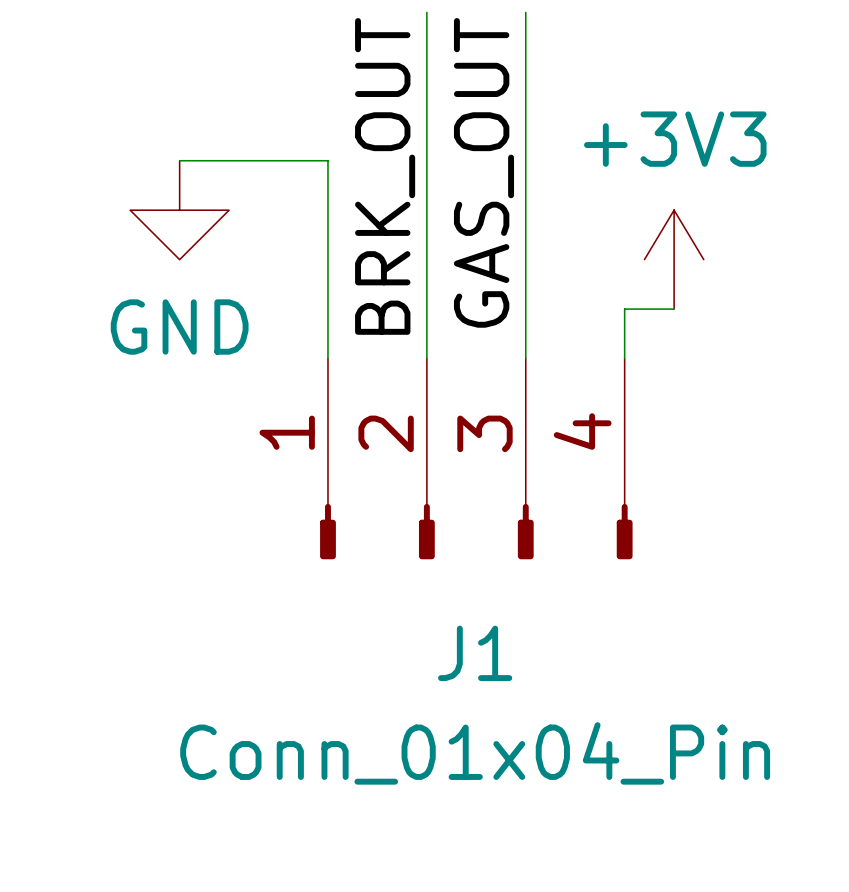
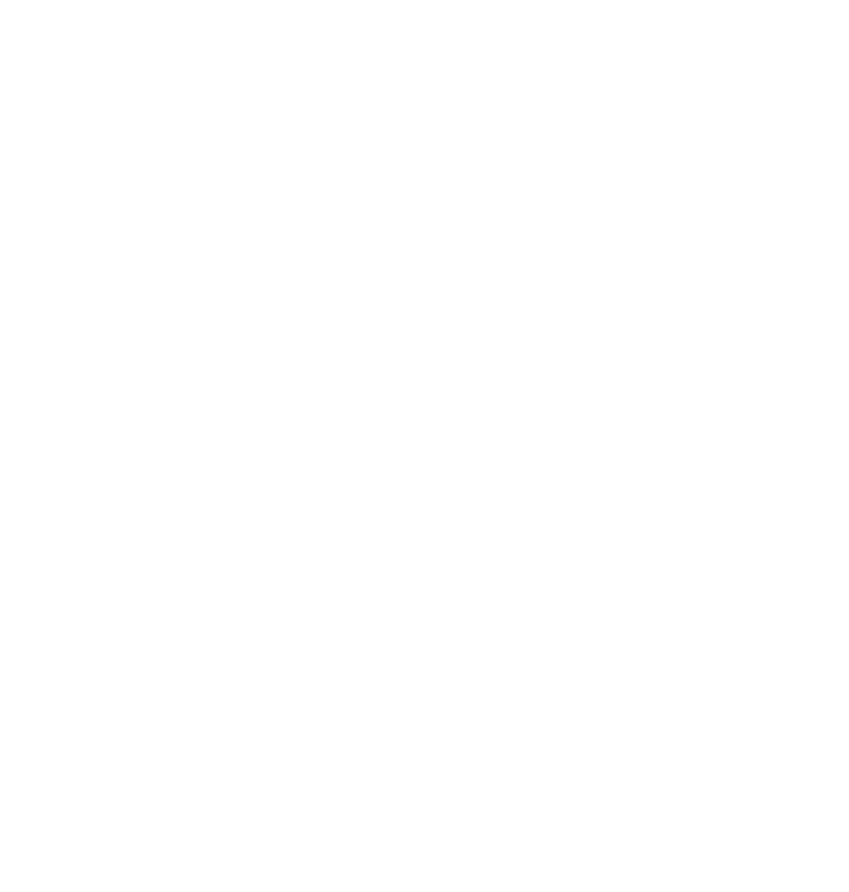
wire: (426, 12) (426, 358) -> none
wire: (525, 12) (525, 358) -> none
wire: (179, 160) (327, 160) (327, 358) -> none
label: GAS_OUT (483, 172) -> none
label: BRK_OUT (385, 176) -> none
power symbol: GND (179, 210) -> none
power symbol: +3V3 (674, 259) -> none
wire: (674, 309) (624, 309) (624, 358) -> none
J1: Conn_01x04_Pin (476, 458) -> none

